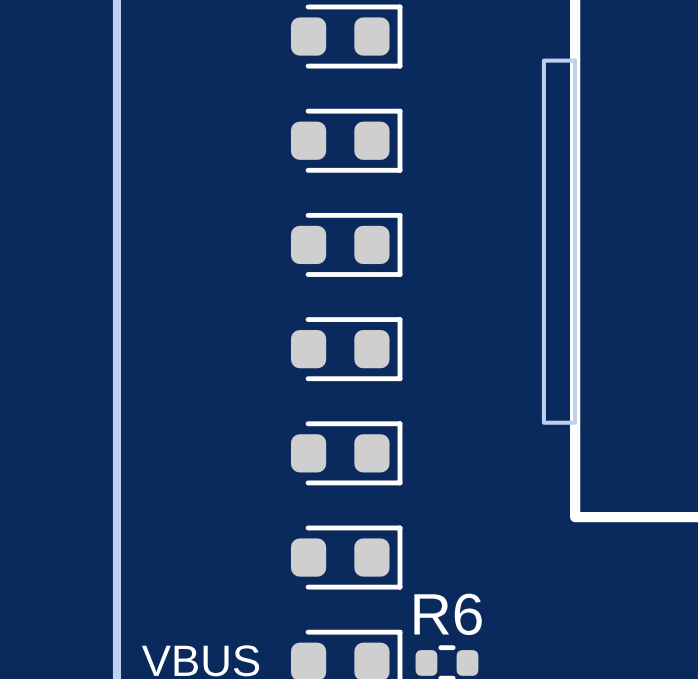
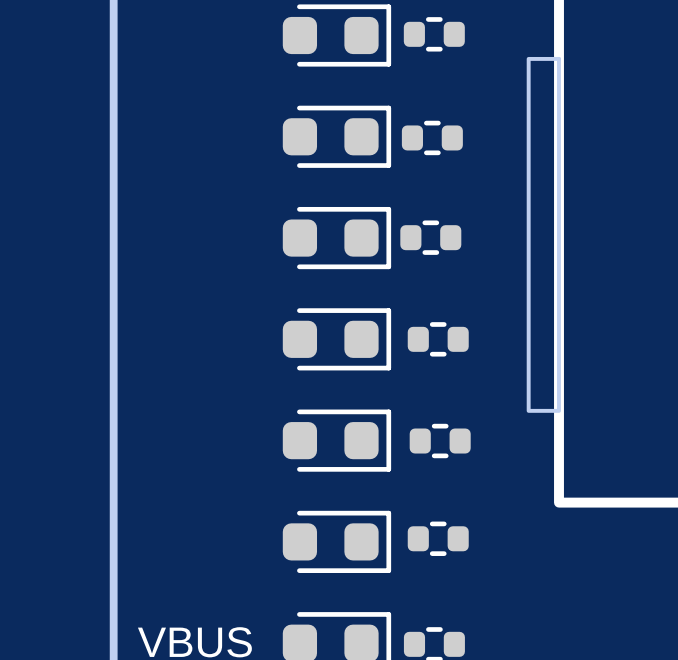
part: none -> (434, 34)
part: none -> (432, 137)
part: none -> (430, 237)
part: none -> (438, 339)
part: none -> (440, 441)
part: none -> (438, 538)
R6 name: R6 (448, 614) -> none

